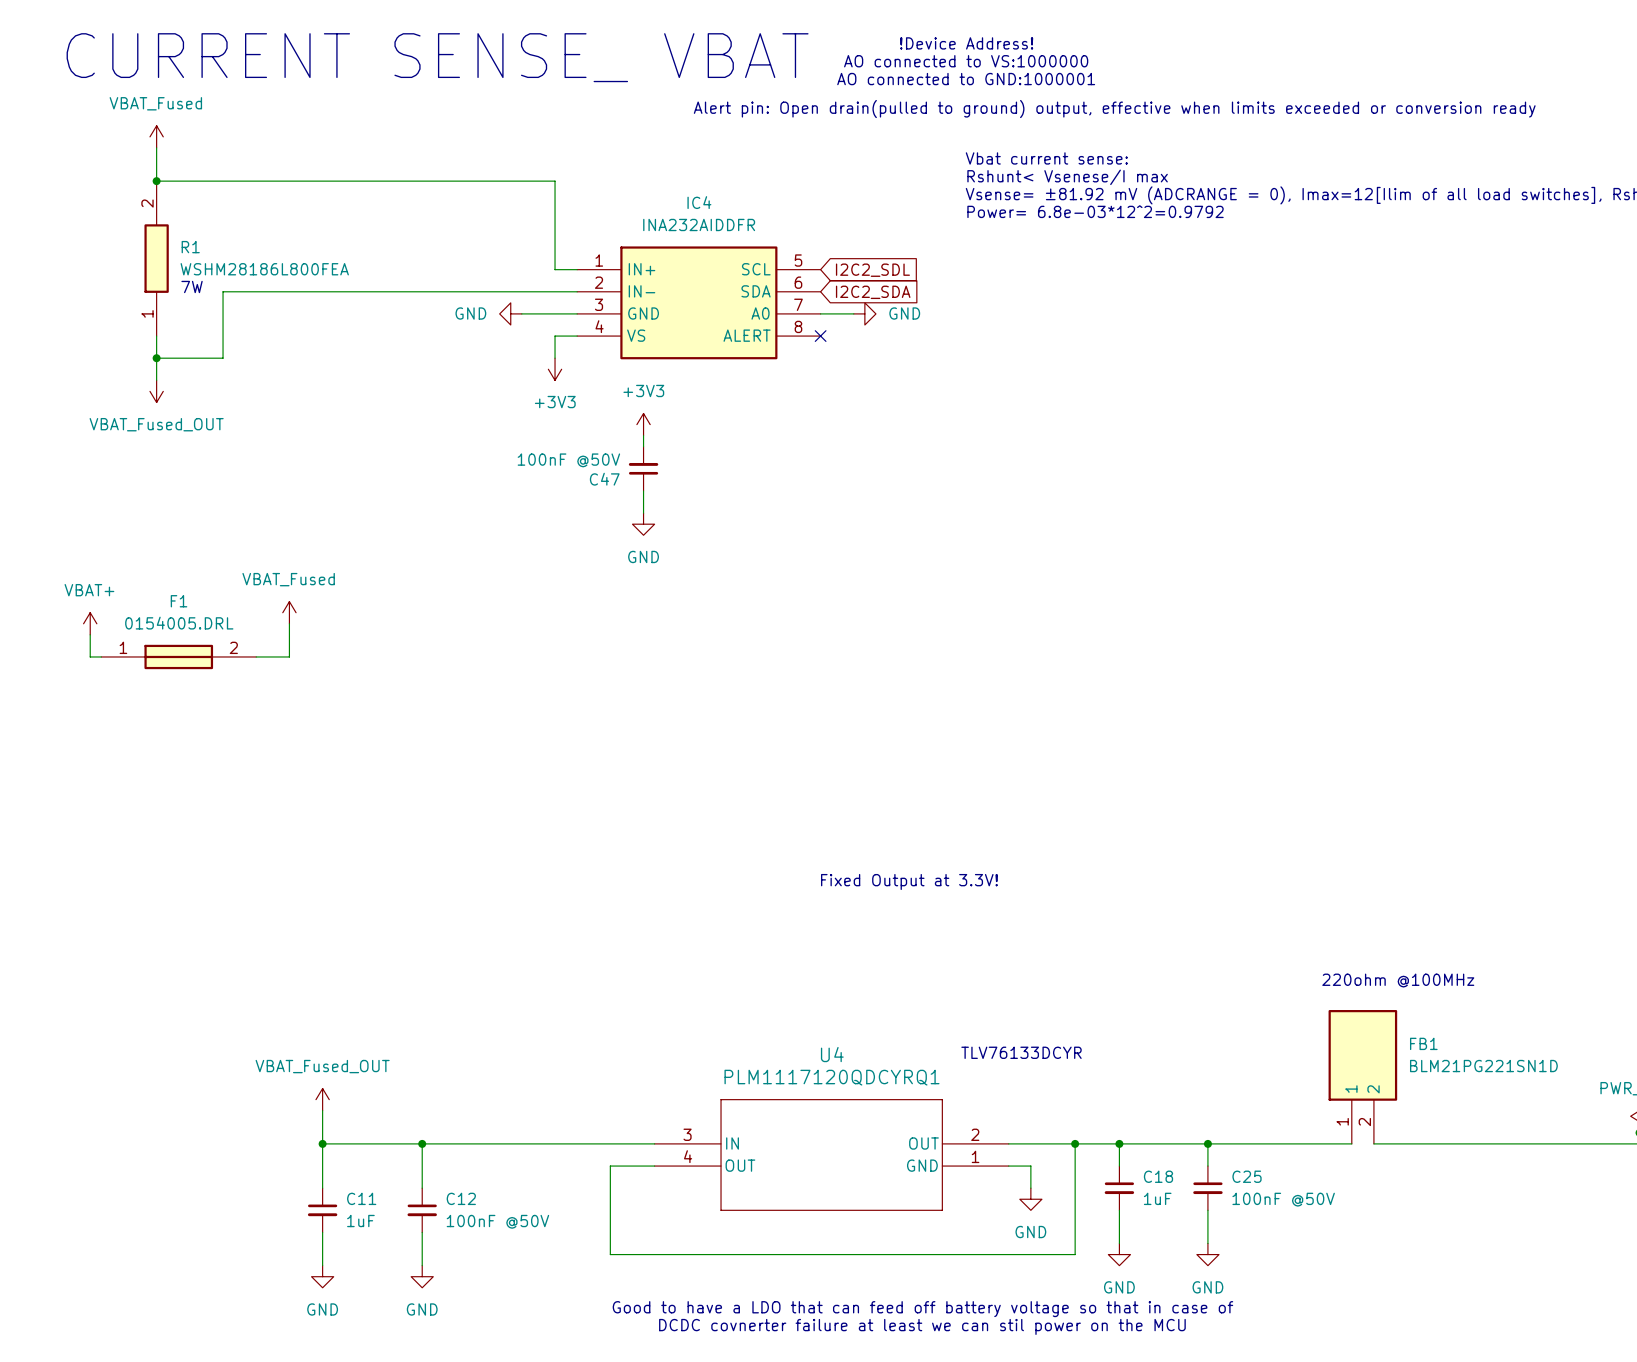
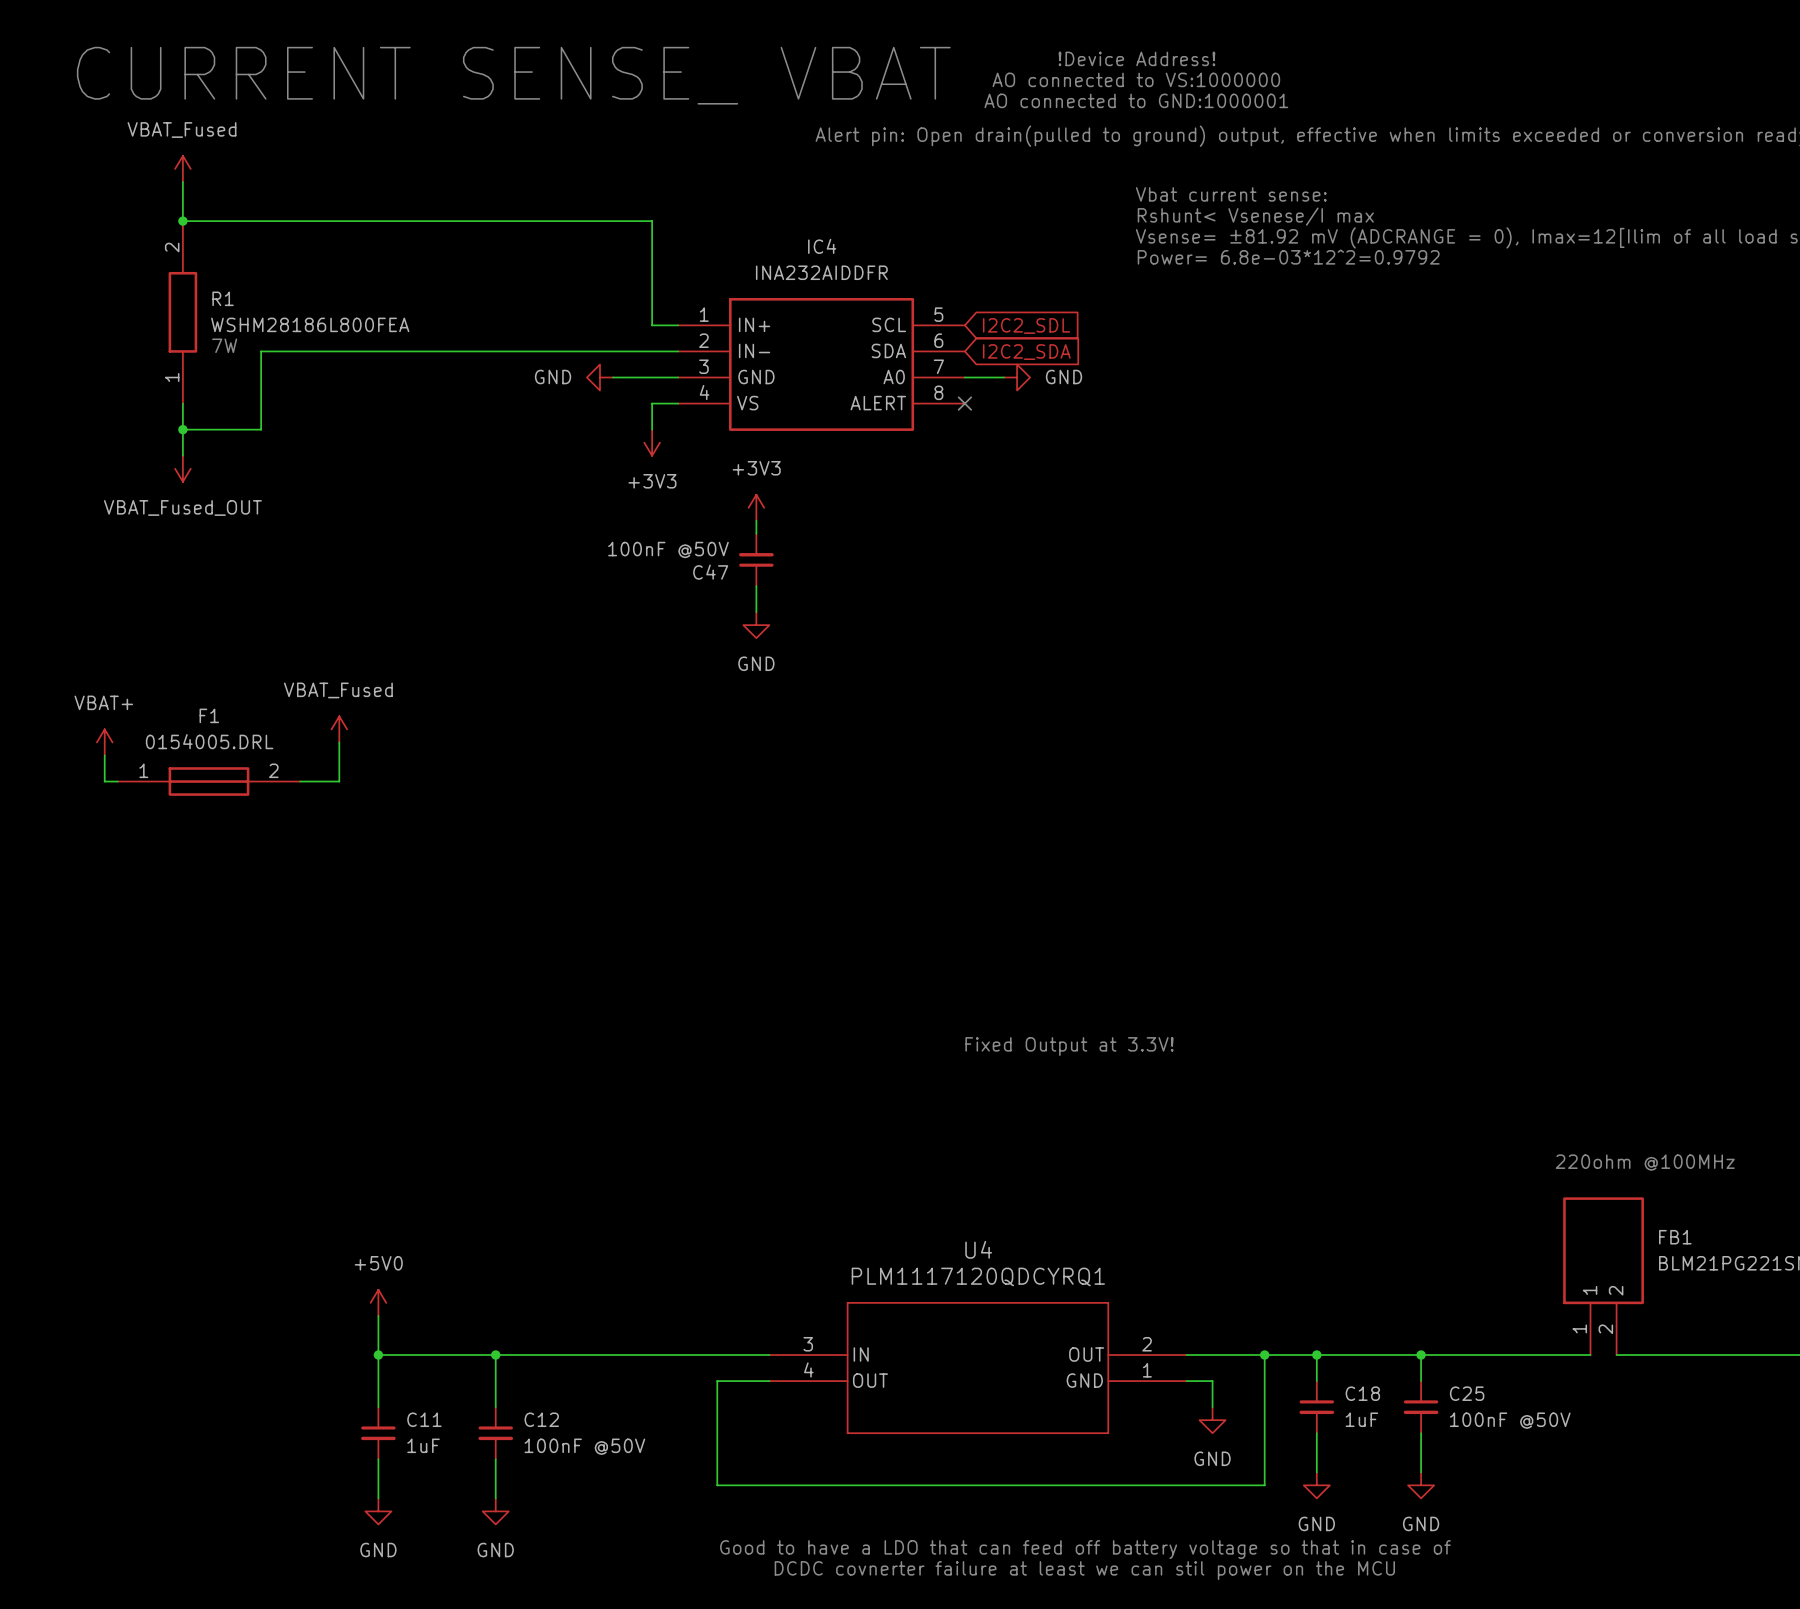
text: TLV76133DCYR (1021, 1052) -> none
power symbol: VBAT_Fused_OUT (322, 1099) -> +5V0 (378, 1302)

